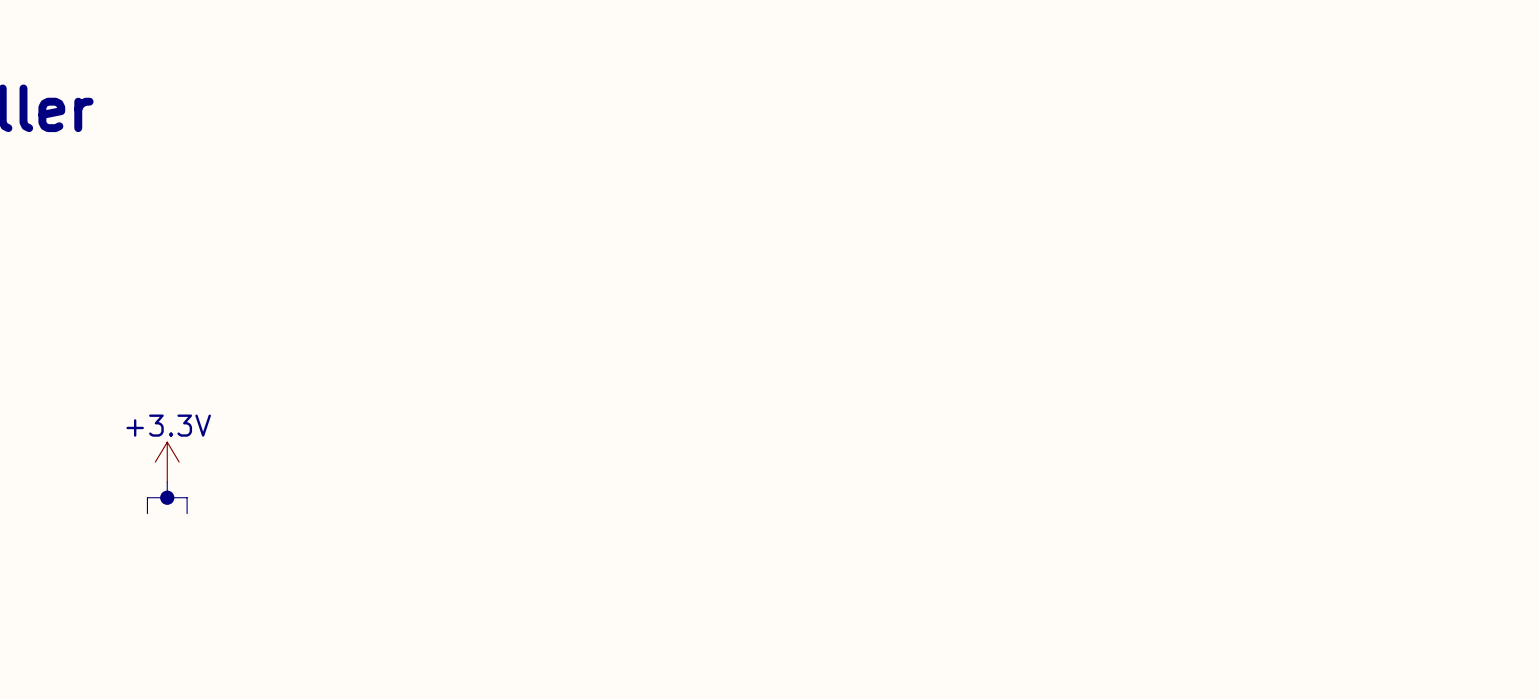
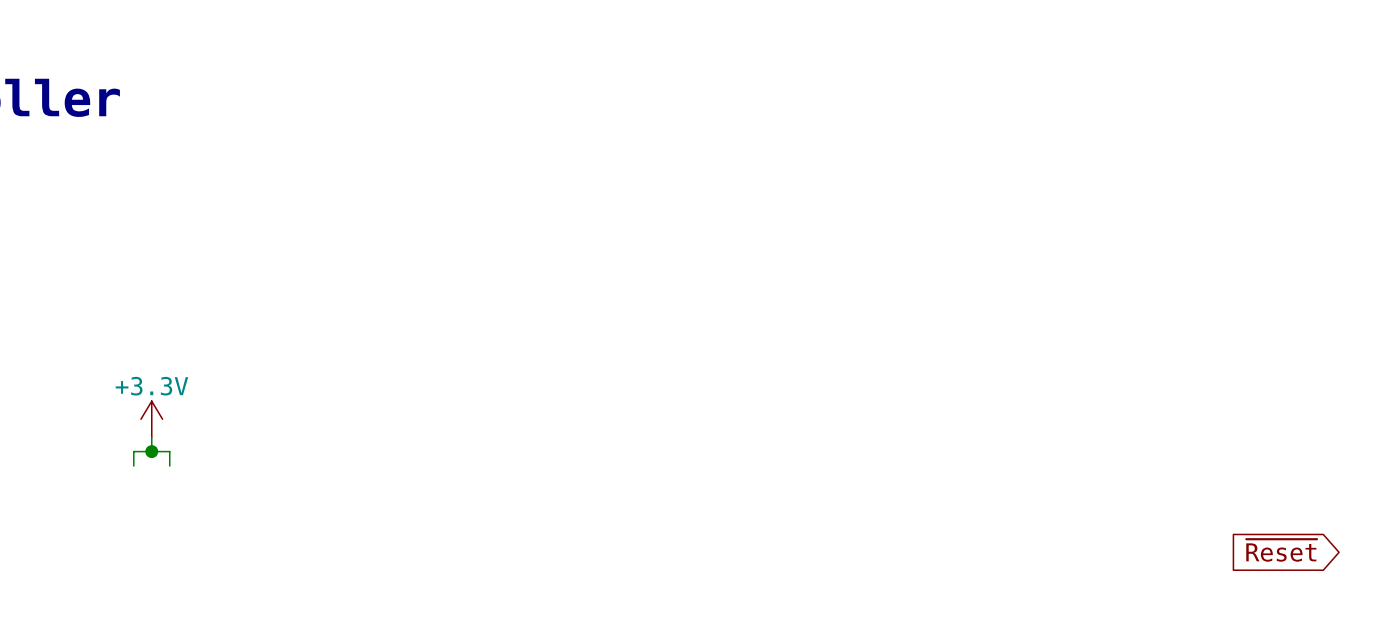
global label: none -> ~{Reset} (1281, 550)

